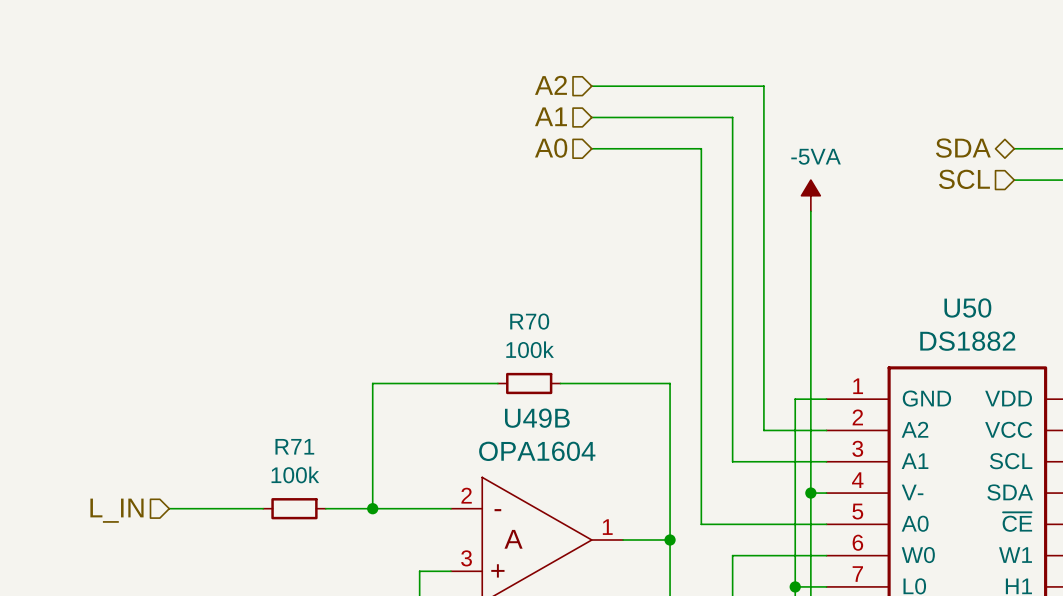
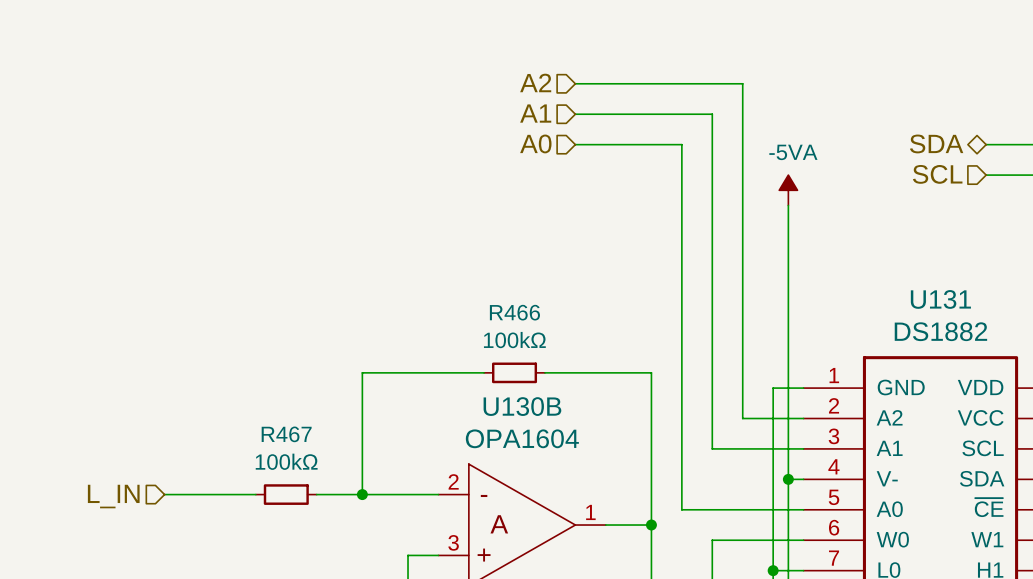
U50 name: U50 (967, 308) -> U131 (940, 299)
R70 name: R70 (529, 321) -> R466 (514, 312)
R70 value: 100k (530, 349) -> 100kΩ (514, 340)
U49B name: U49B (537, 418) -> U130B (522, 406)
R71 name: R71 (294, 446) -> R467 (286, 434)
R71 value: 100k (295, 474) -> 100kΩ (286, 461)

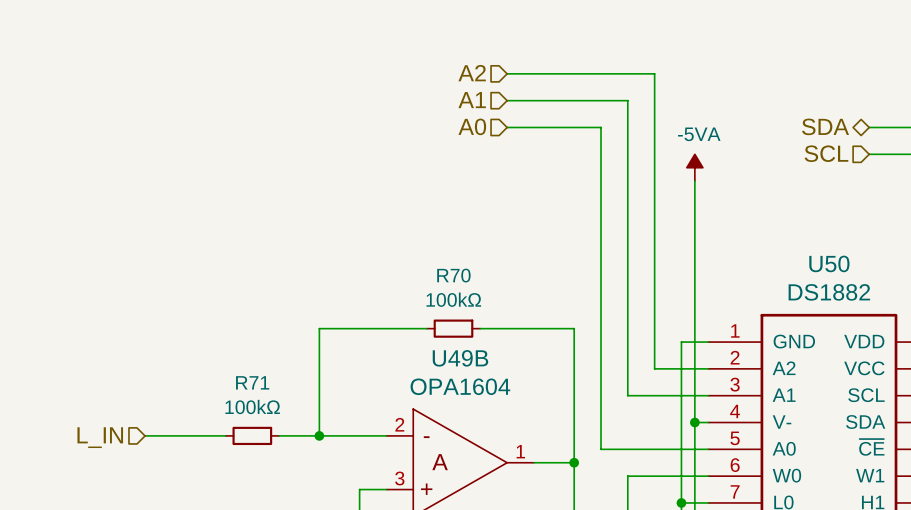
U131 name: U131 (940, 299) -> U50 (829, 263)
R466 name: R466 (514, 312) -> R70 (453, 275)
U130B name: U130B (522, 406) -> U49B (460, 358)
R467 name: R467 (286, 434) -> R71 (252, 382)

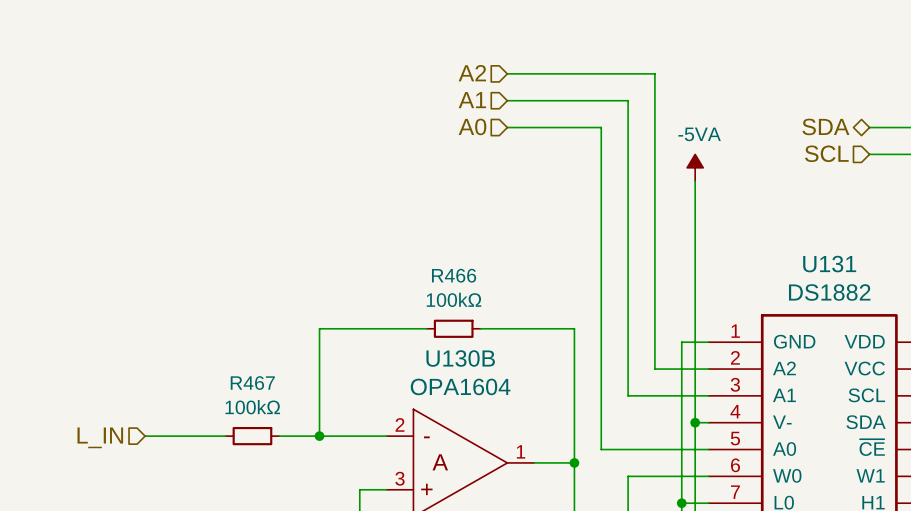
U50 name: U50 (829, 263) -> U131 (829, 264)
R70 name: R70 (453, 275) -> R466 (454, 275)
U49B name: U49B (460, 358) -> U130B (460, 358)
R71 name: R71 (252, 382) -> R467 (252, 383)

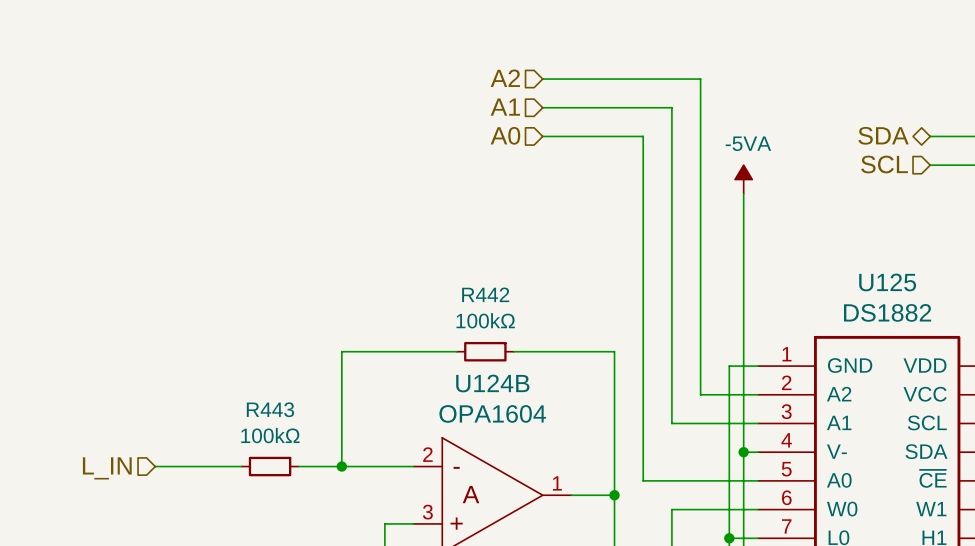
U131 name: U131 (829, 264) -> U125 (887, 282)
R466 name: R466 (454, 275) -> R442 (485, 294)
U130B name: U130B (460, 358) -> U124B (492, 383)
R467 name: R467 (252, 383) -> R443 (270, 409)

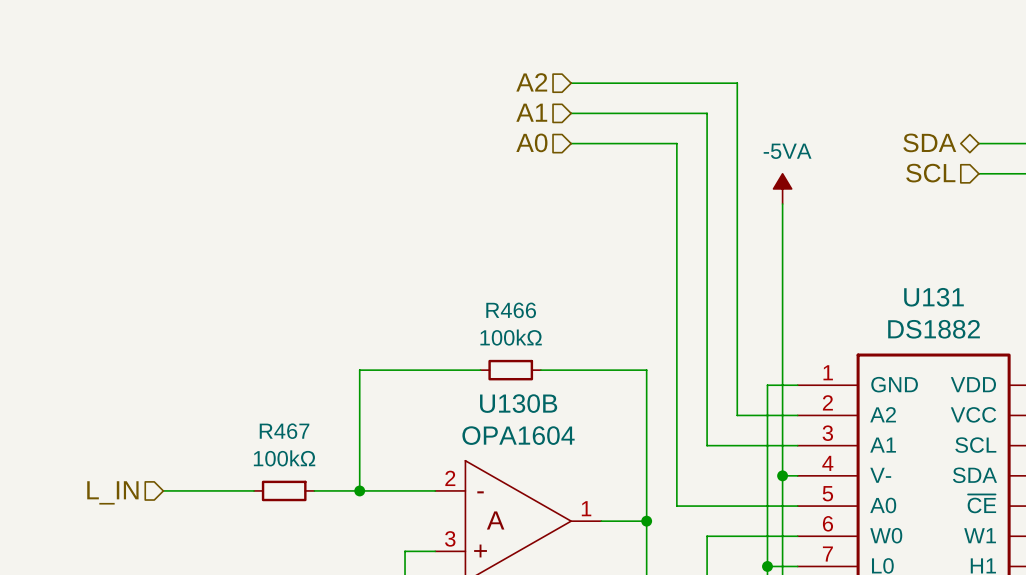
U125 name: U125 (887, 282) -> U131 (933, 297)
R442 name: R442 (485, 294) -> R466 (511, 310)
U124B name: U124B (492, 383) -> U130B (518, 403)
R443 name: R443 (270, 409) -> R467 (284, 431)

